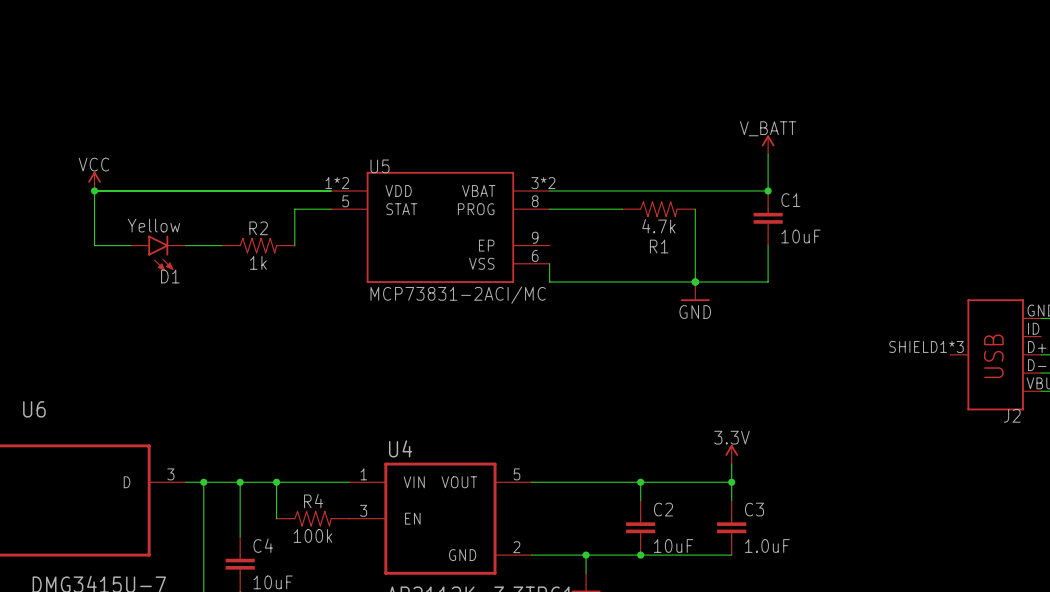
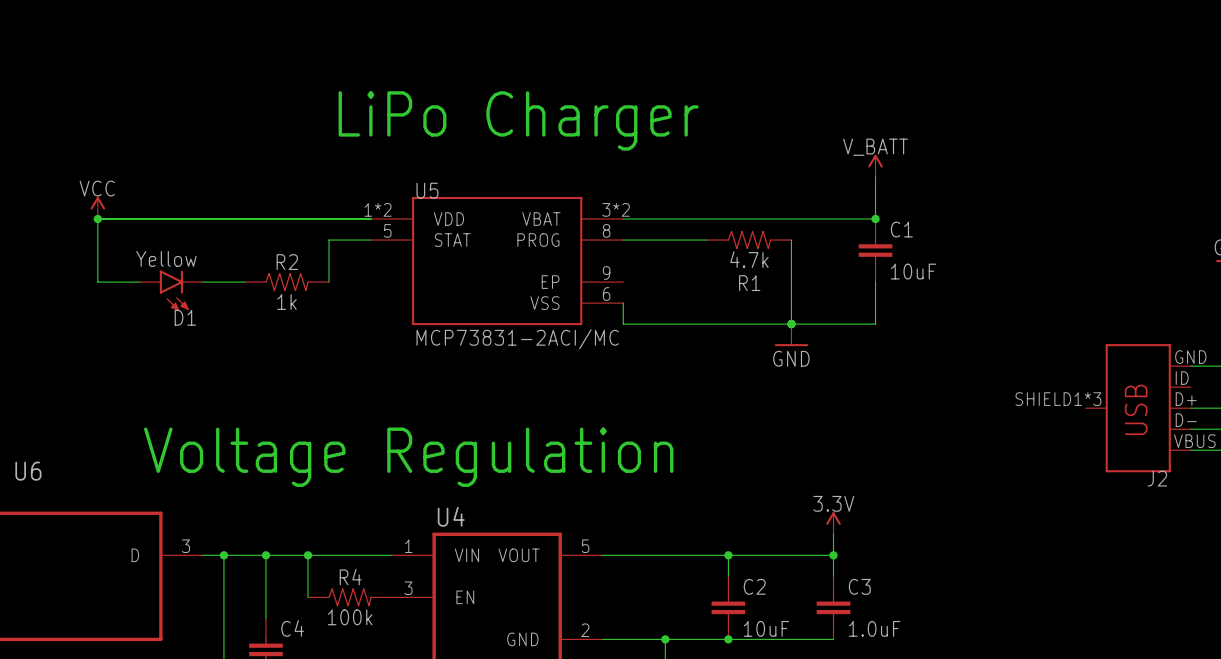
text: none -> LiPo Charger (518, 120)
text: none -> Voltage Regulation (408, 457)

